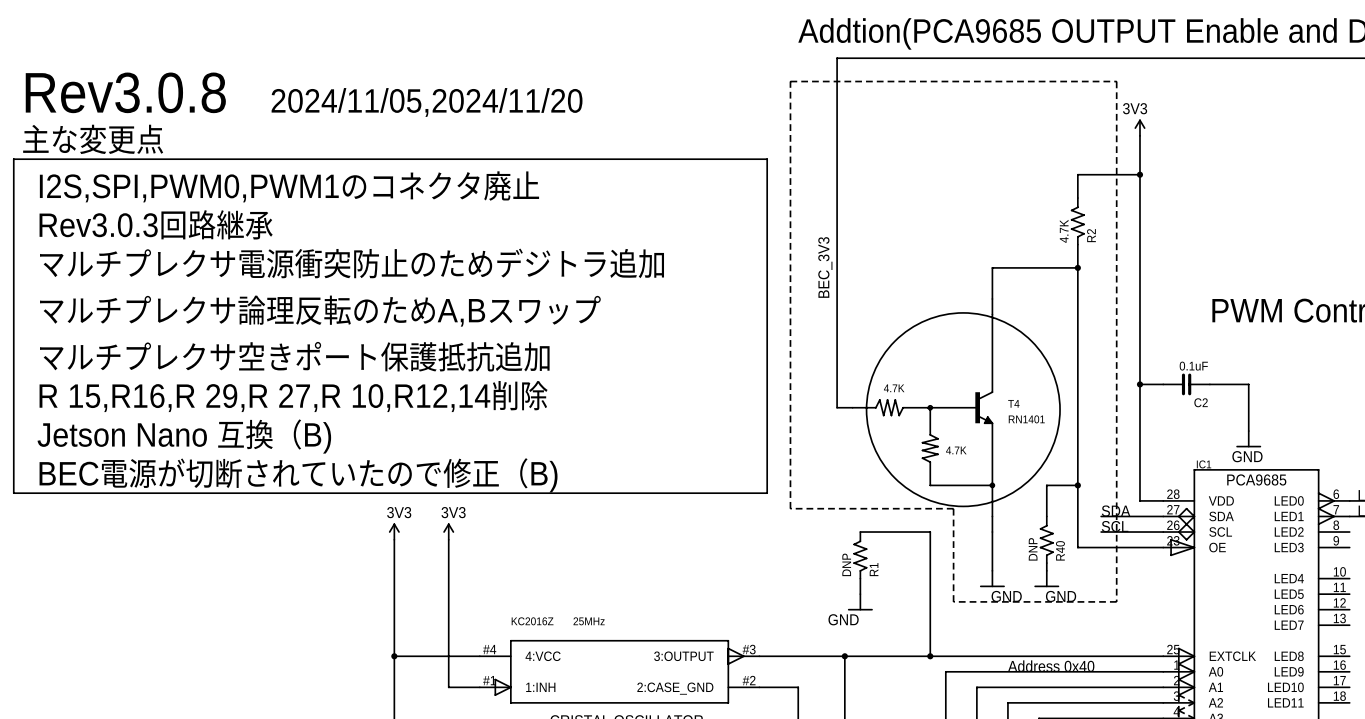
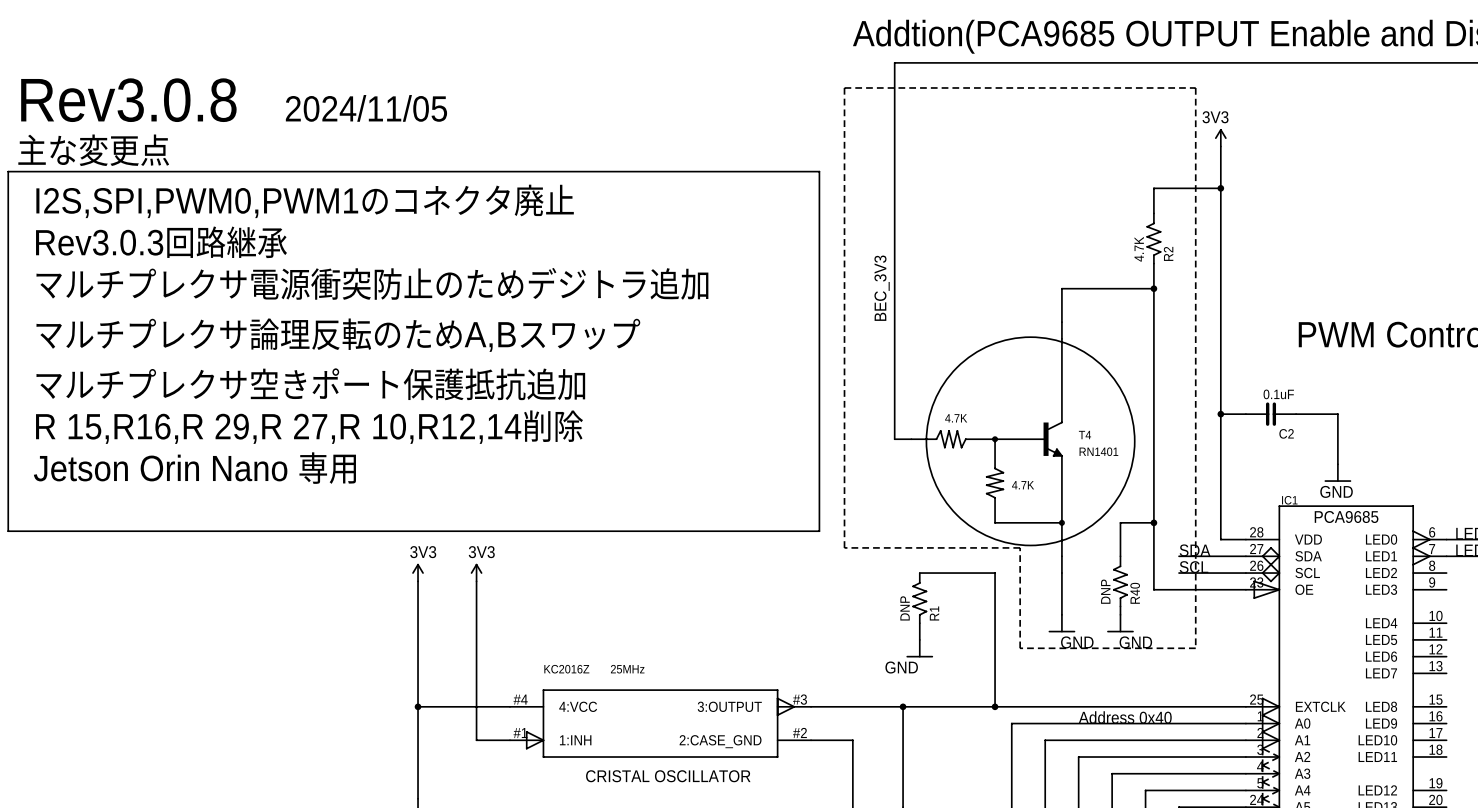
text: 2024/11/05,2024/11/20 (427, 102) -> 2024/11/05 (366, 108)
text: Jetson Nano 互換（B) (184, 436) -> Jetson Orin Nano 専用 (194, 468)
text: BEC電源が切断されていたので修正（B) (298, 475) -> none

